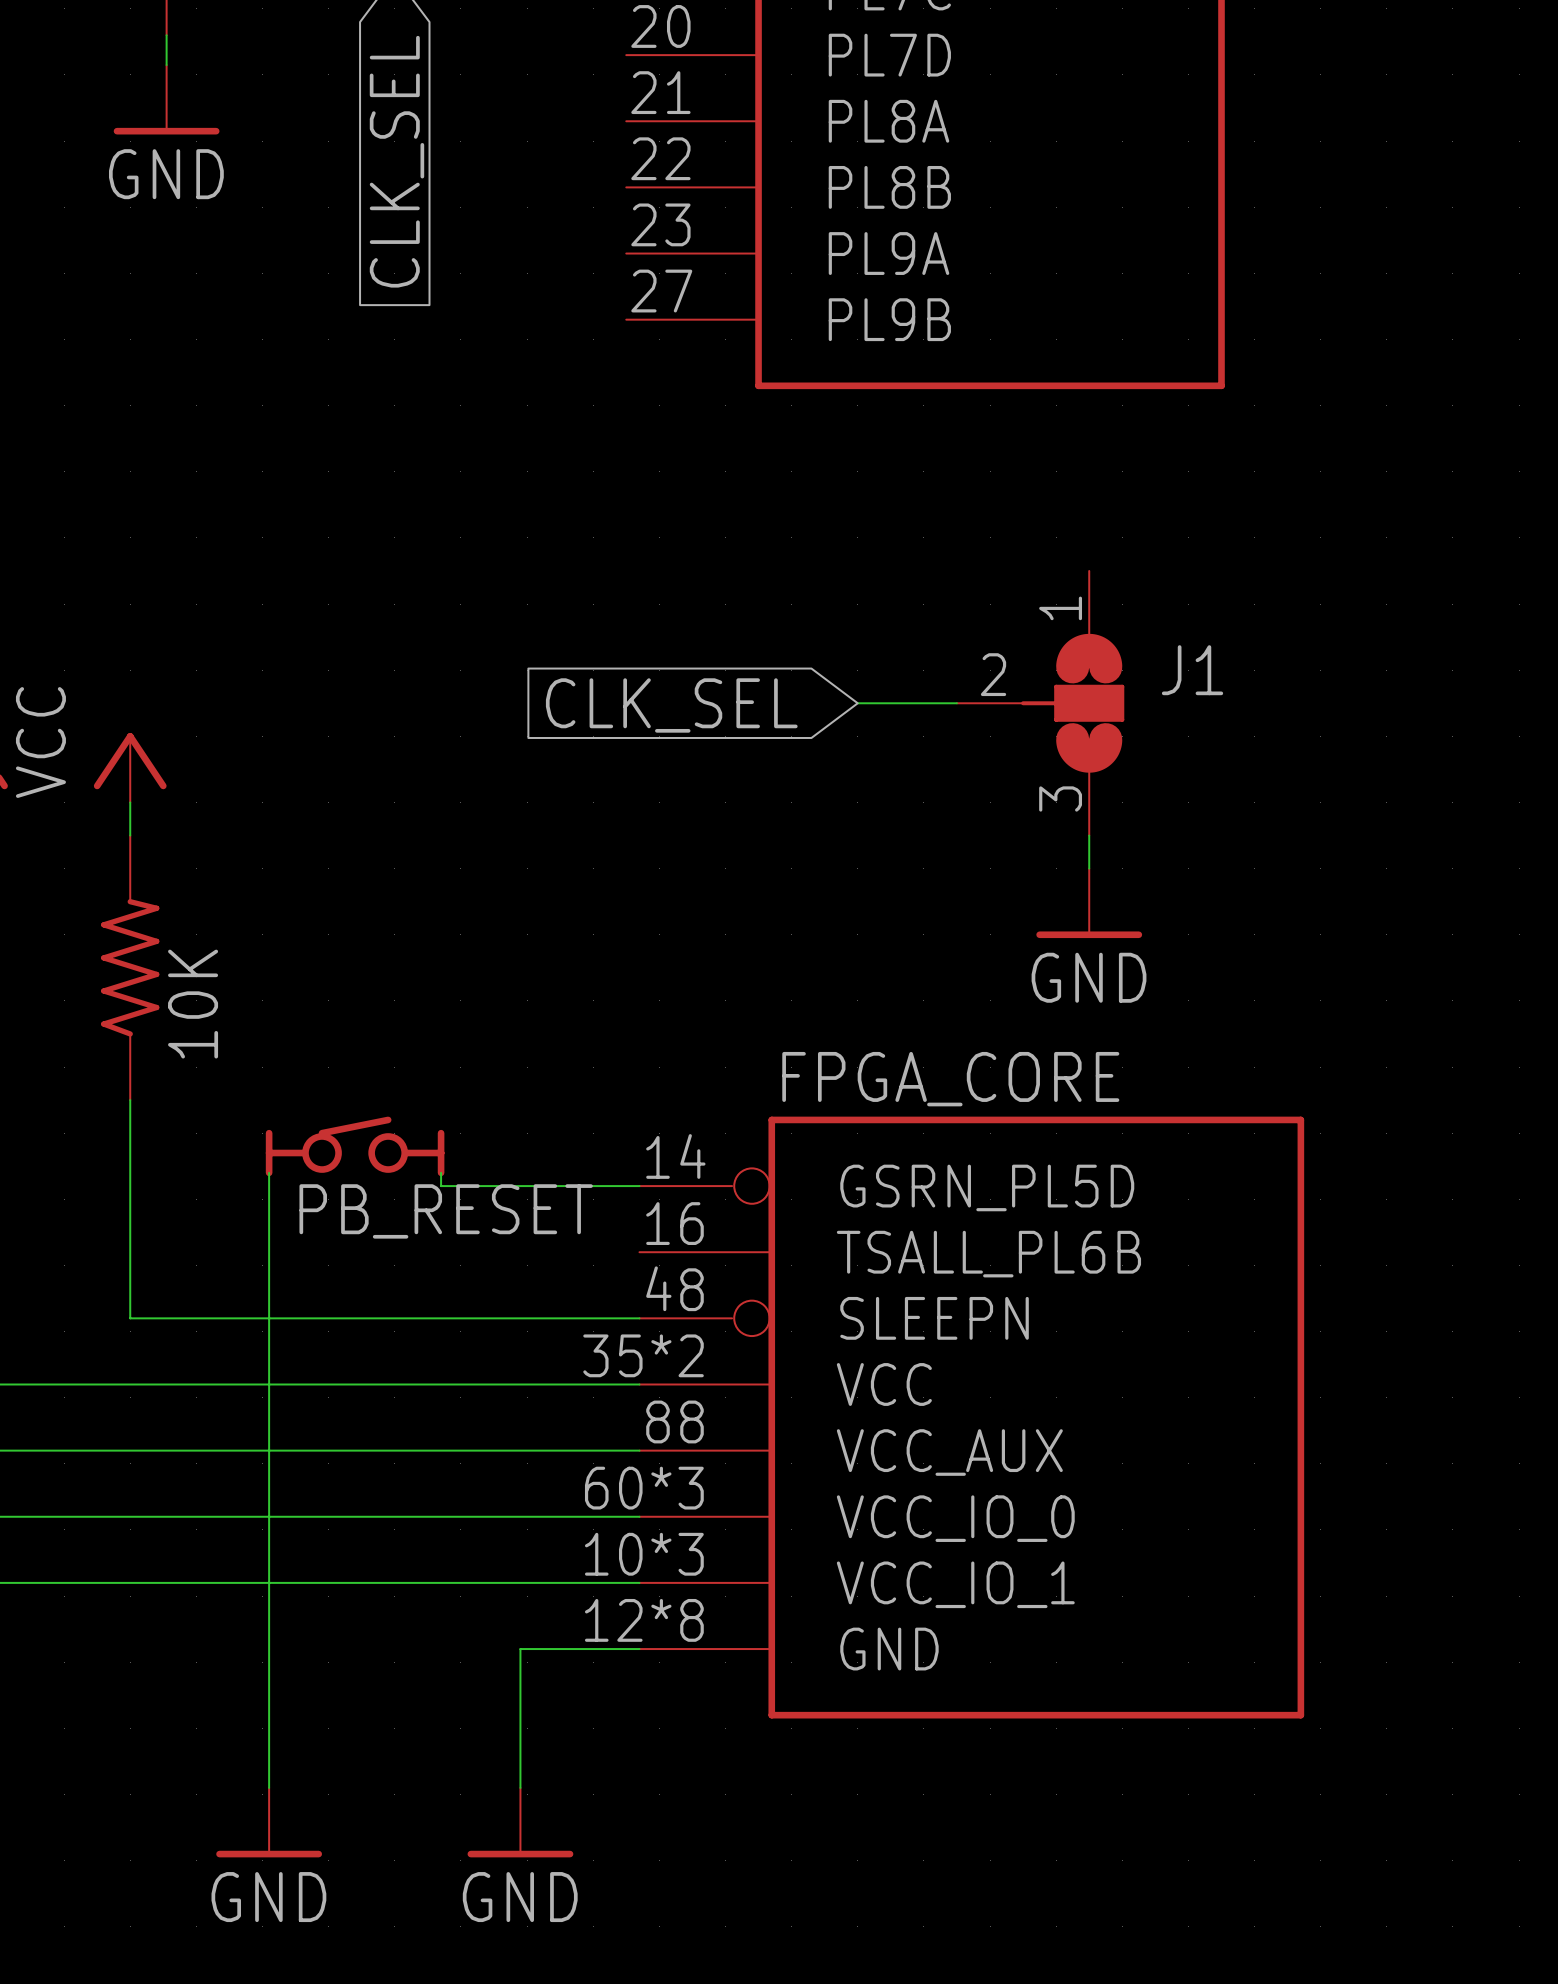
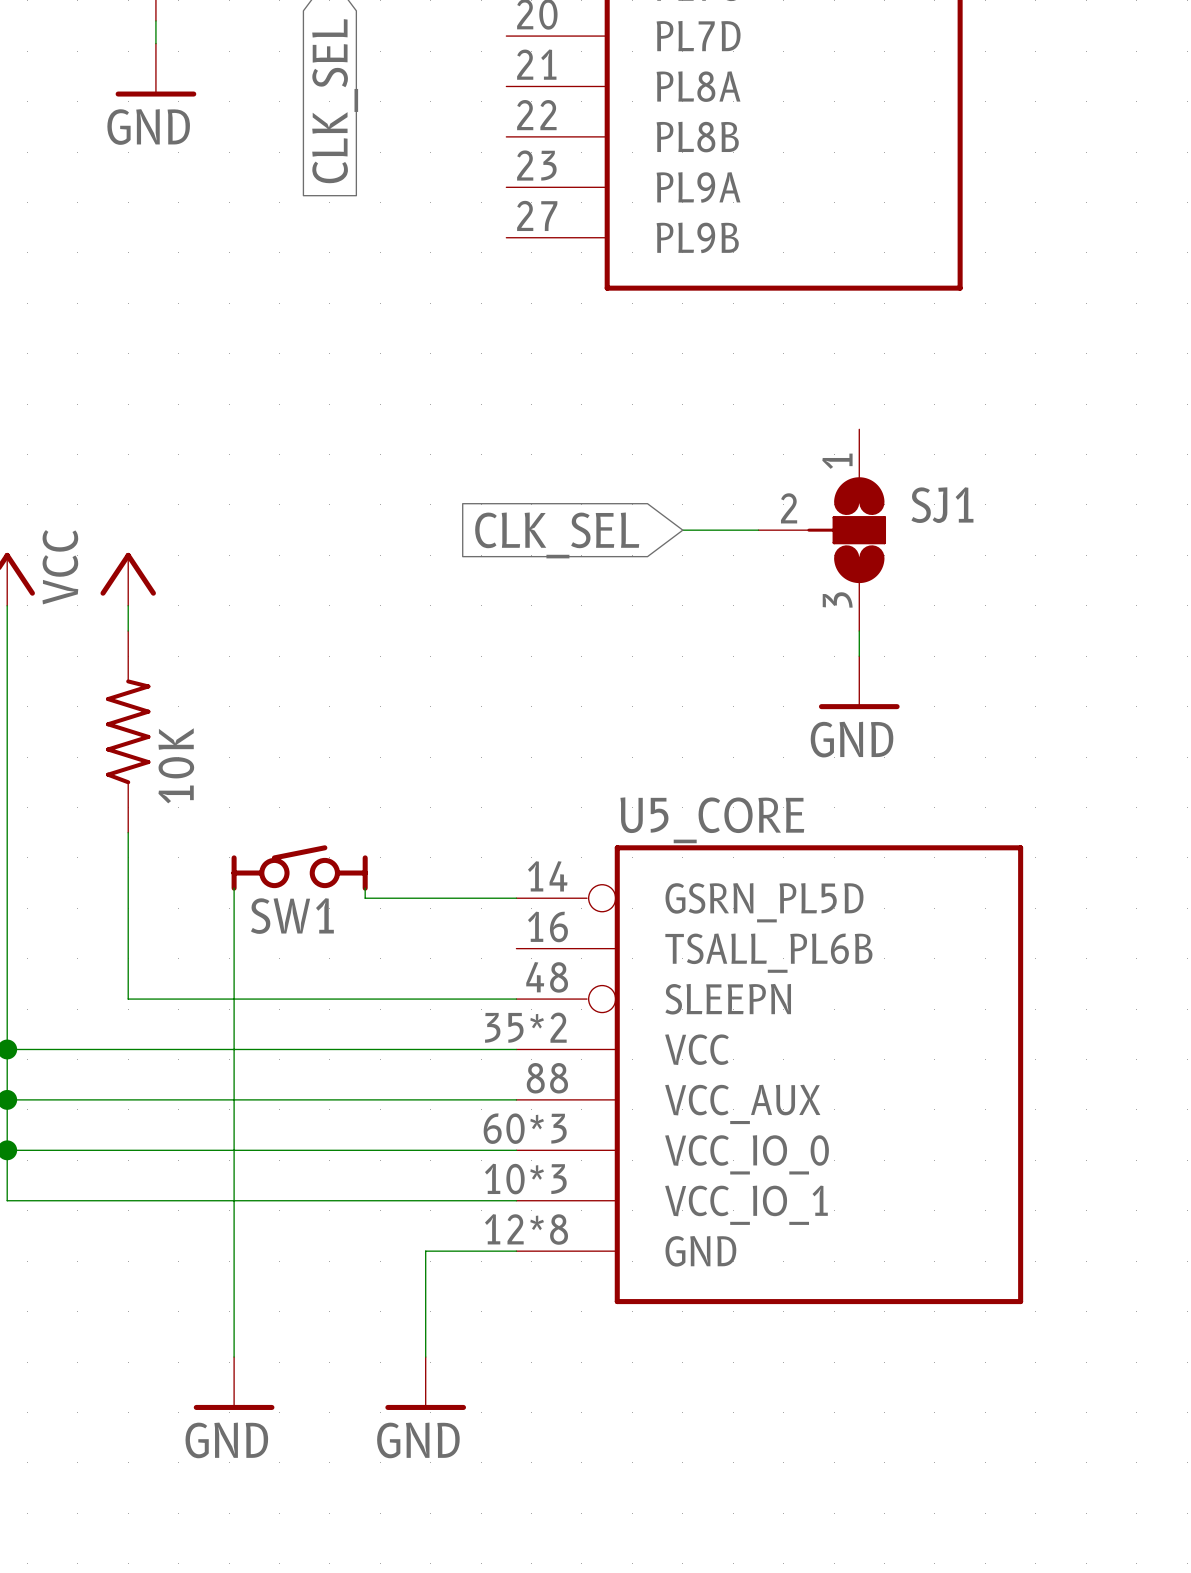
J1 name: J1 (1192, 670) -> SJ1 (942, 505)
FPGA_CORE name: FPGA_CORE (950, 1079) -> U5_CORE (712, 820)
PB_RESET name: PB_RESET (446, 1211) -> SW1 (292, 916)

